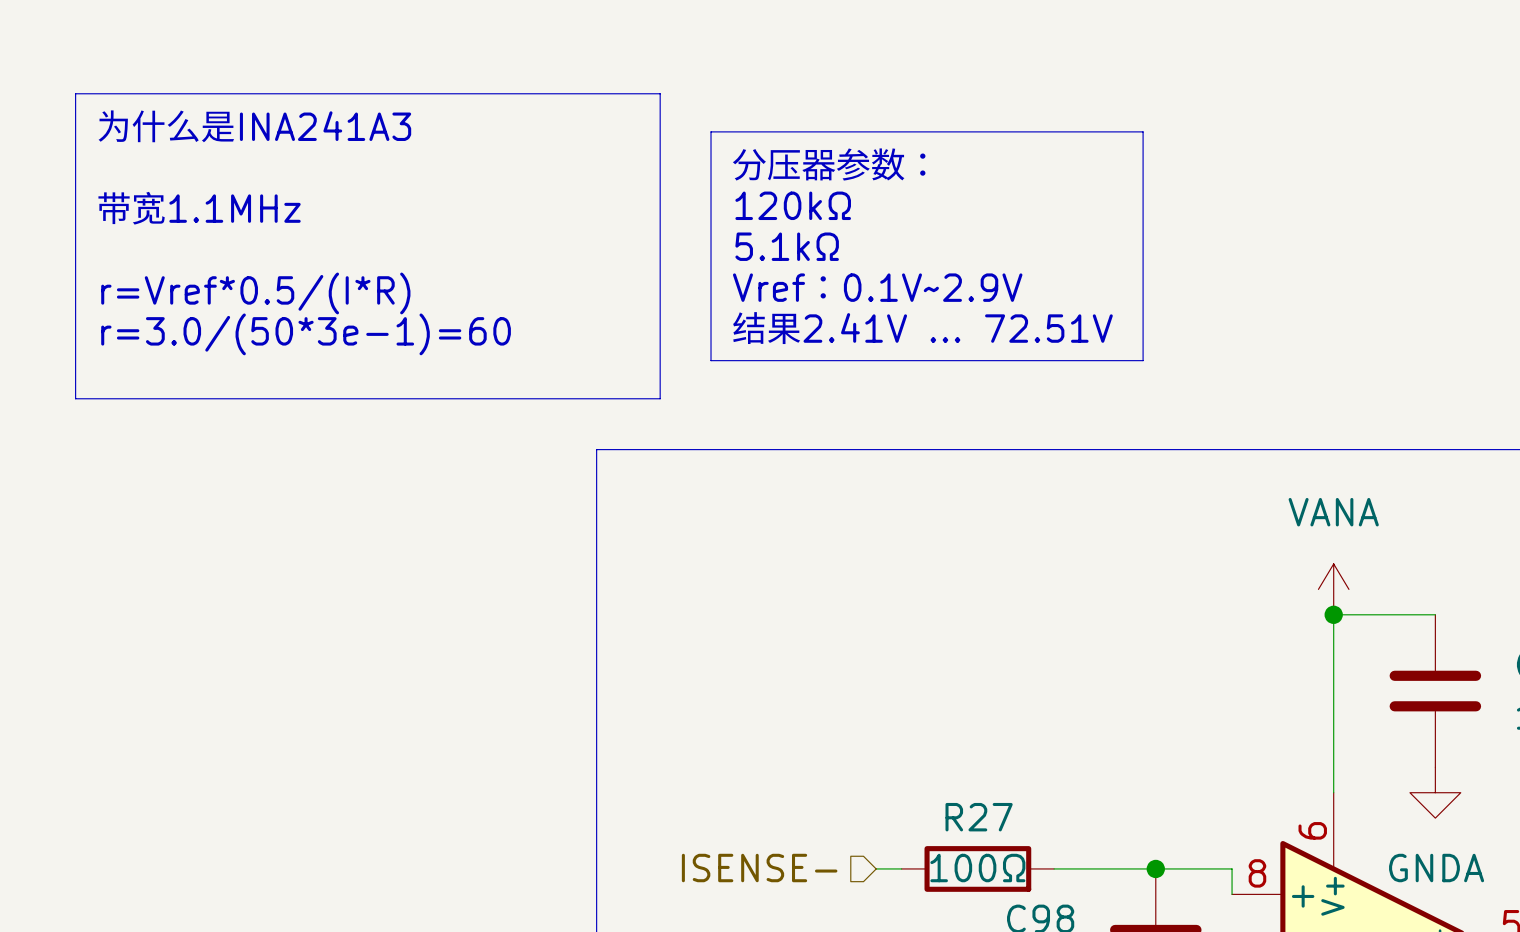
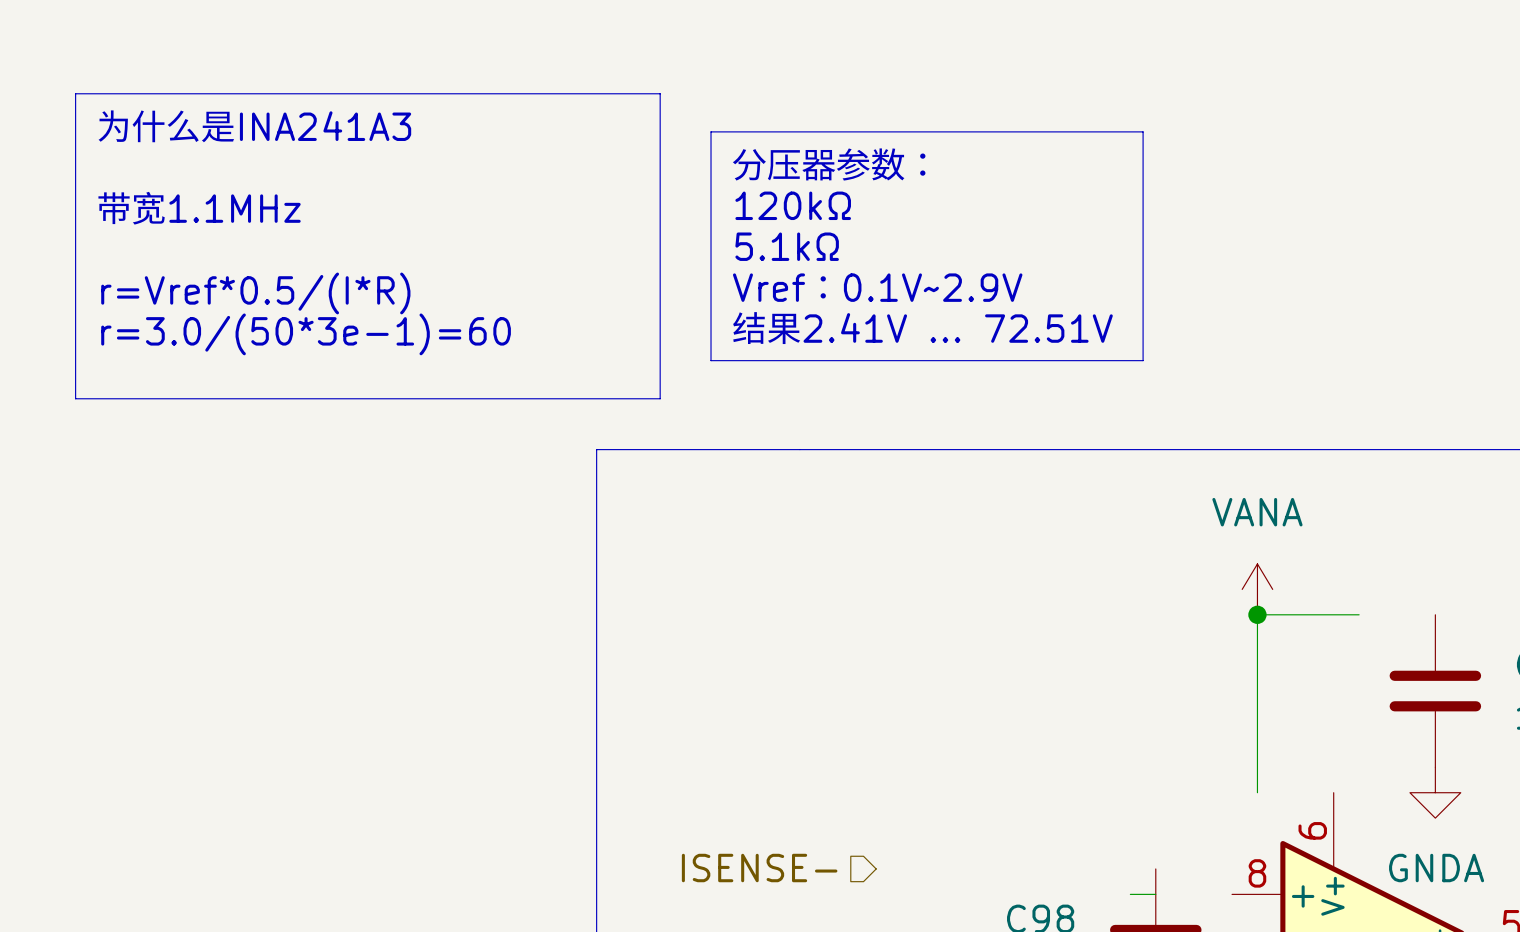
power symbol position: VANA (1333, 589) -> VANA (1257, 589)
wire: (1333, 614) (1333, 792) -> (1333, 614) (1257, 614) (1257, 792)
junction position: (1333, 614) -> (1257, 614)
wire: (1359, 614) (1435, 614) -> none
wire: (876, 868) (901, 868) -> (1130, 894) (1155, 894)
R27: 100Ω (977, 868) -> none
wire: (1054, 868) (1232, 868) (1232, 894) -> none
junction: (1155, 868) -> none

